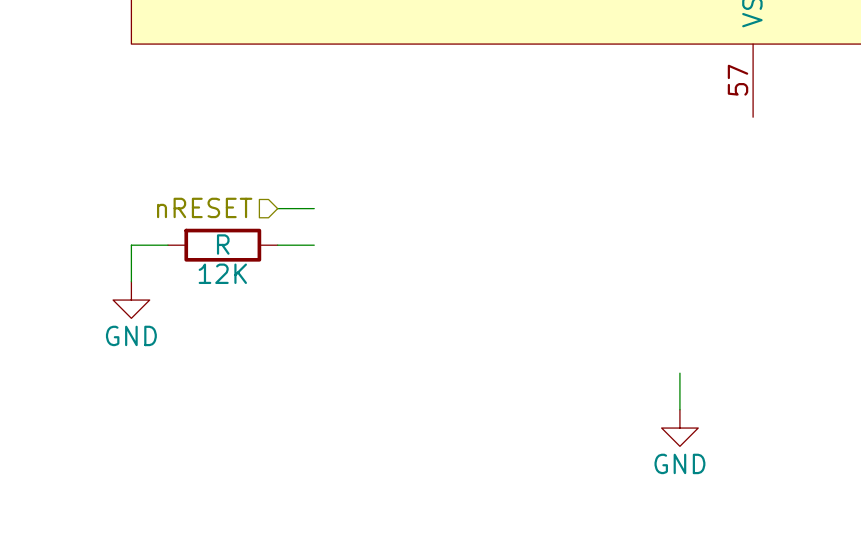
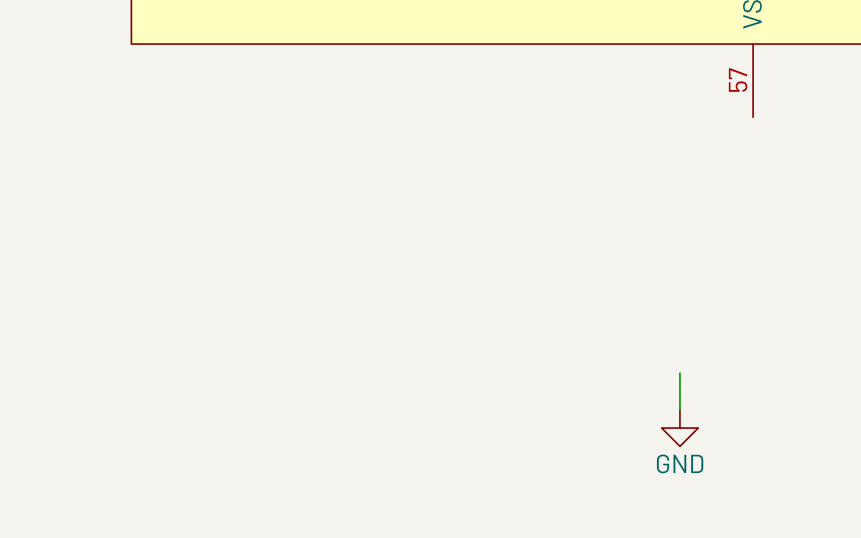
hierarchical label: nRESET (204, 207) -> none
wire: (277, 208) (314, 208) -> none
wire: (167, 245) (131, 245) (131, 281) -> none
12K: R (222, 245) -> none
wire: (277, 245) (314, 245) -> none
power symbol: GND (131, 300) -> none

